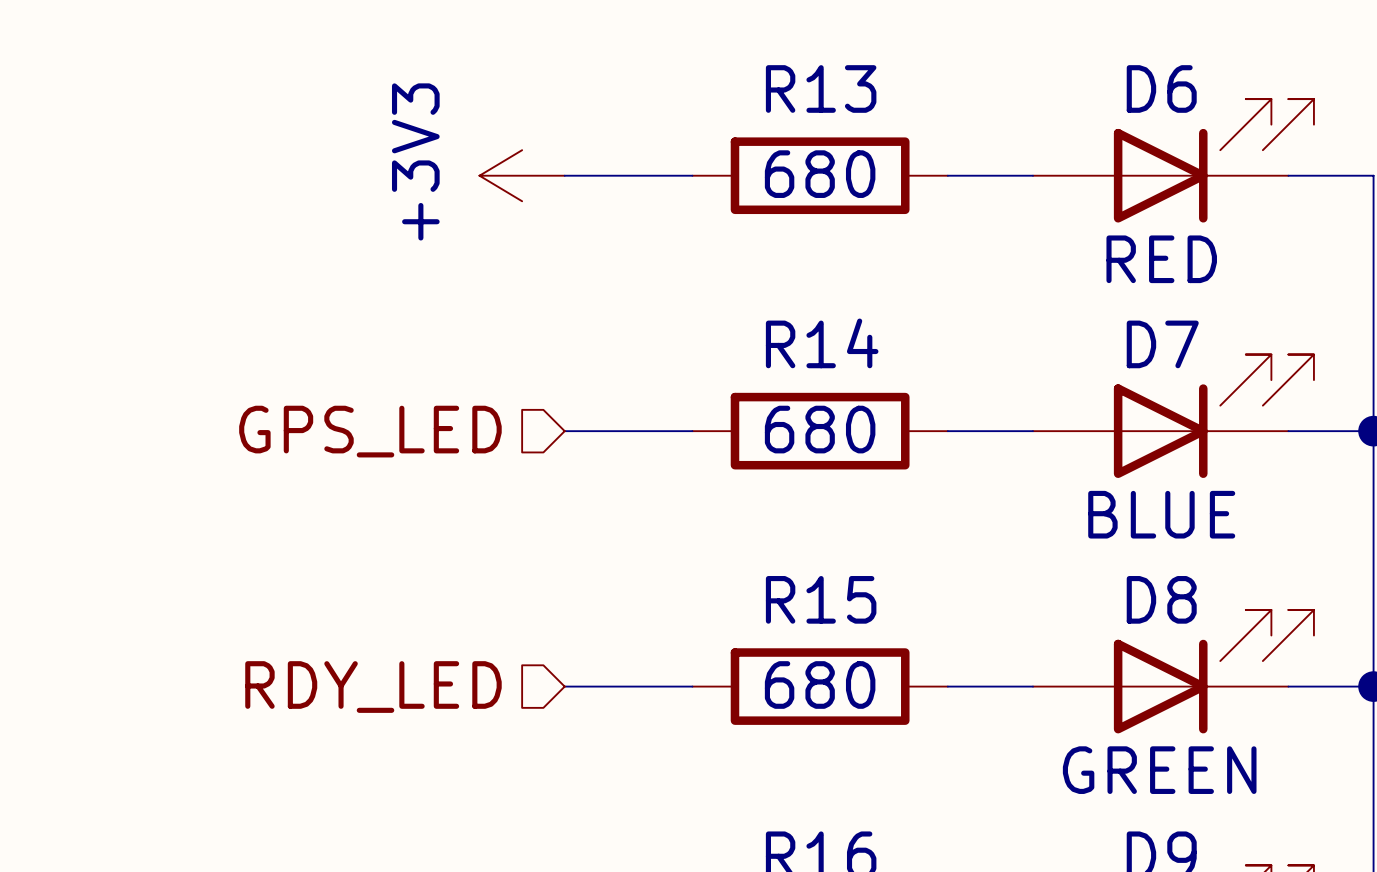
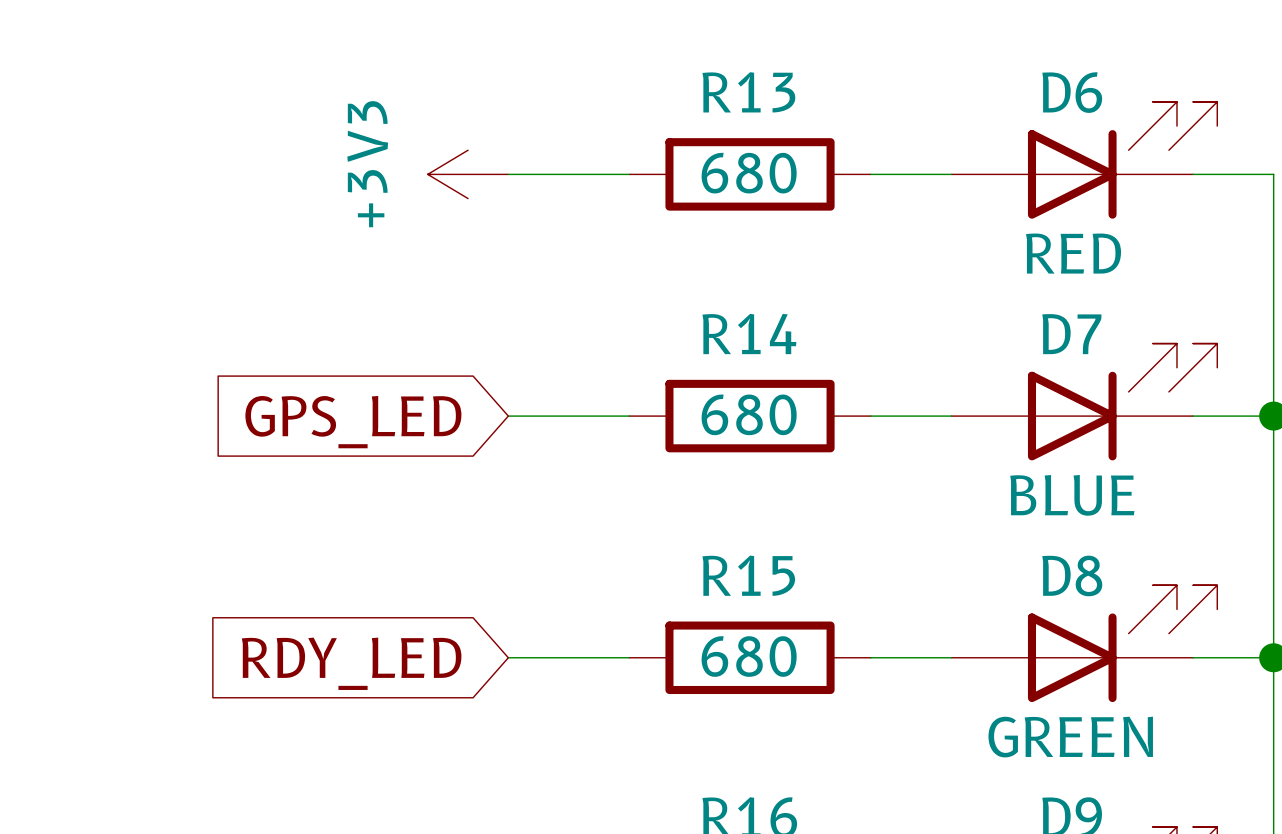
hierarchical label: GPS_LED (370, 431) -> none
global label: none -> GPS_LED (353, 422)
hierarchical label: RDY_LED (373, 687) -> none
global label: none -> RDY_LED (351, 663)

